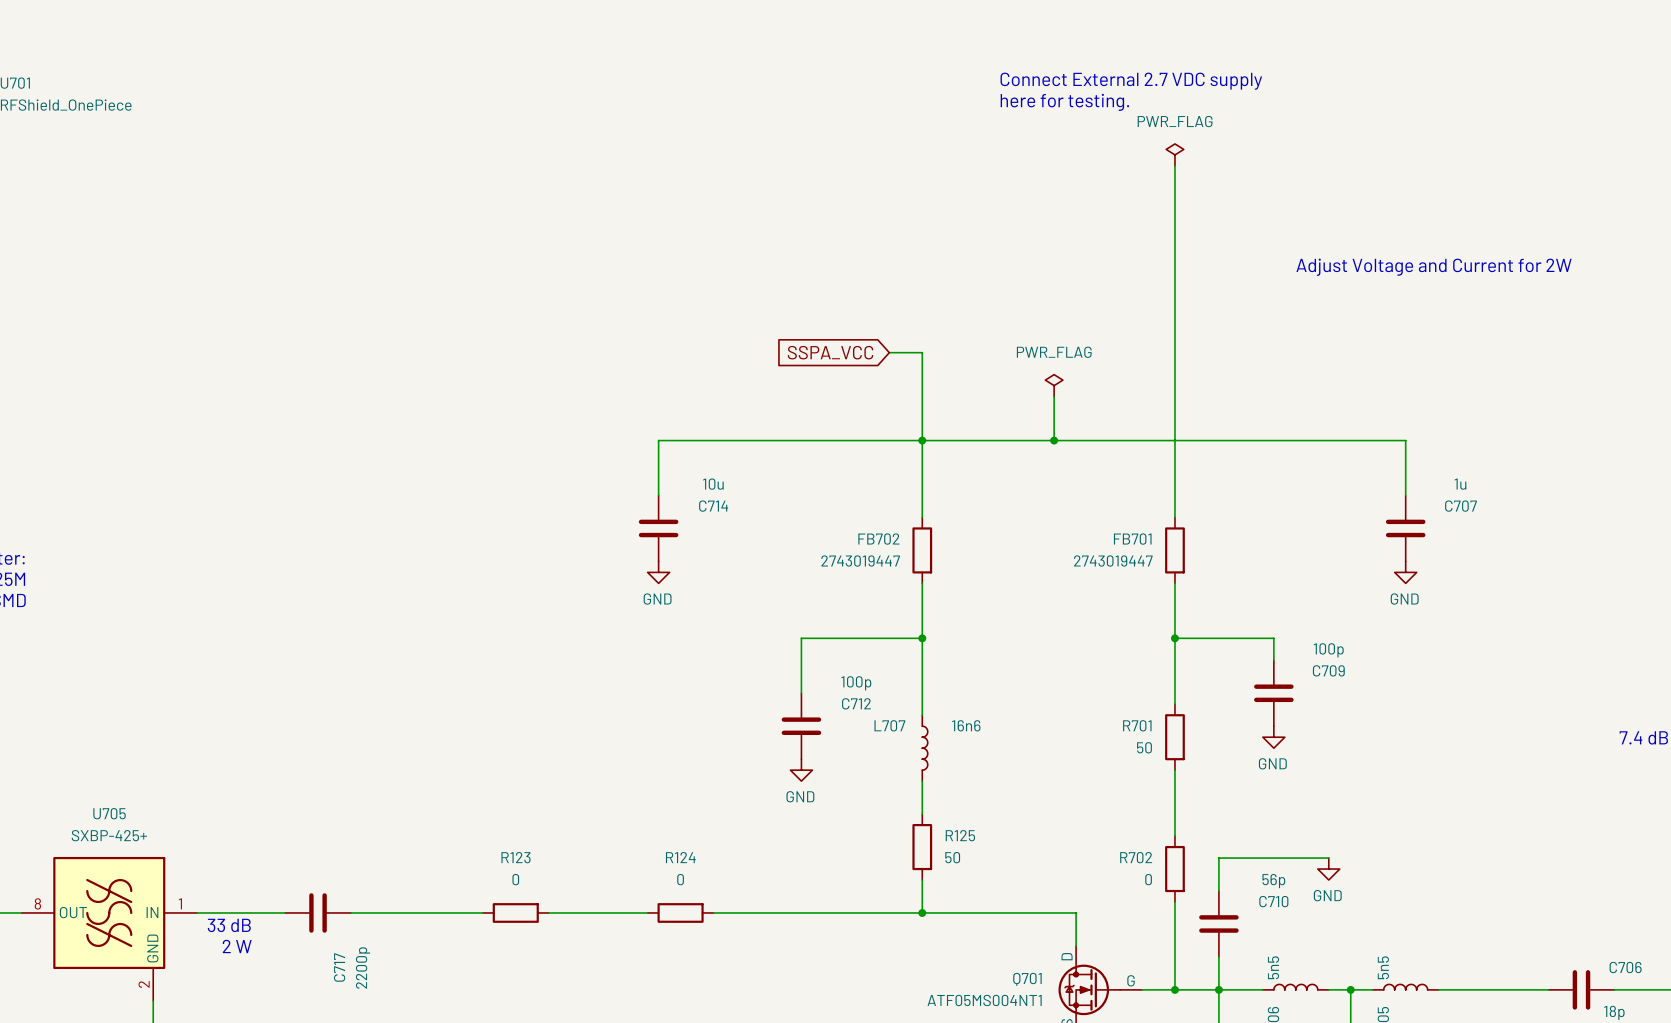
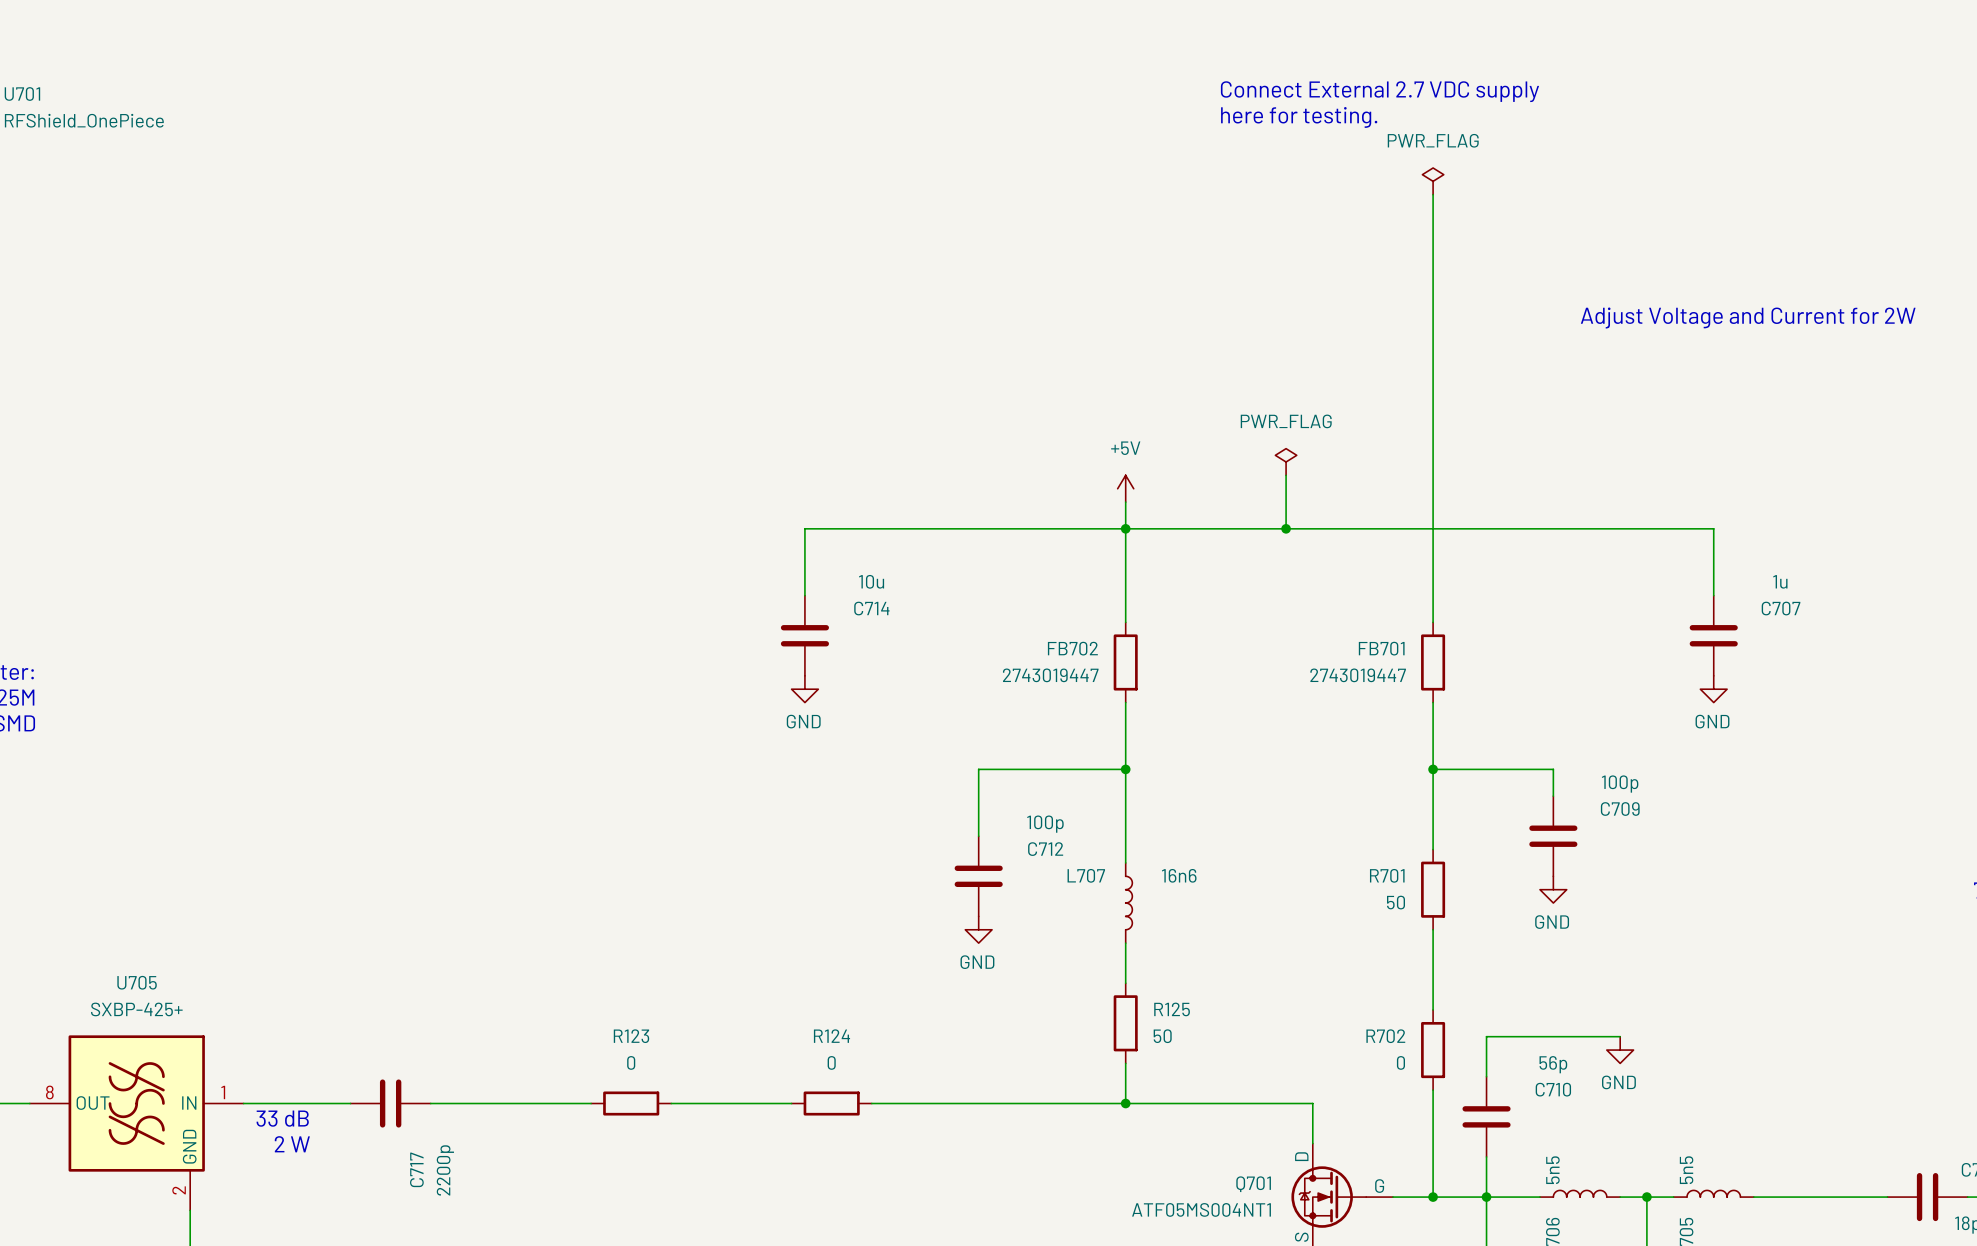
global label: SSPA_VCC (830, 352) -> none
wire: (889, 352) (922, 352) (922, 418) -> none
power symbol: none -> +5V (1125, 488)

